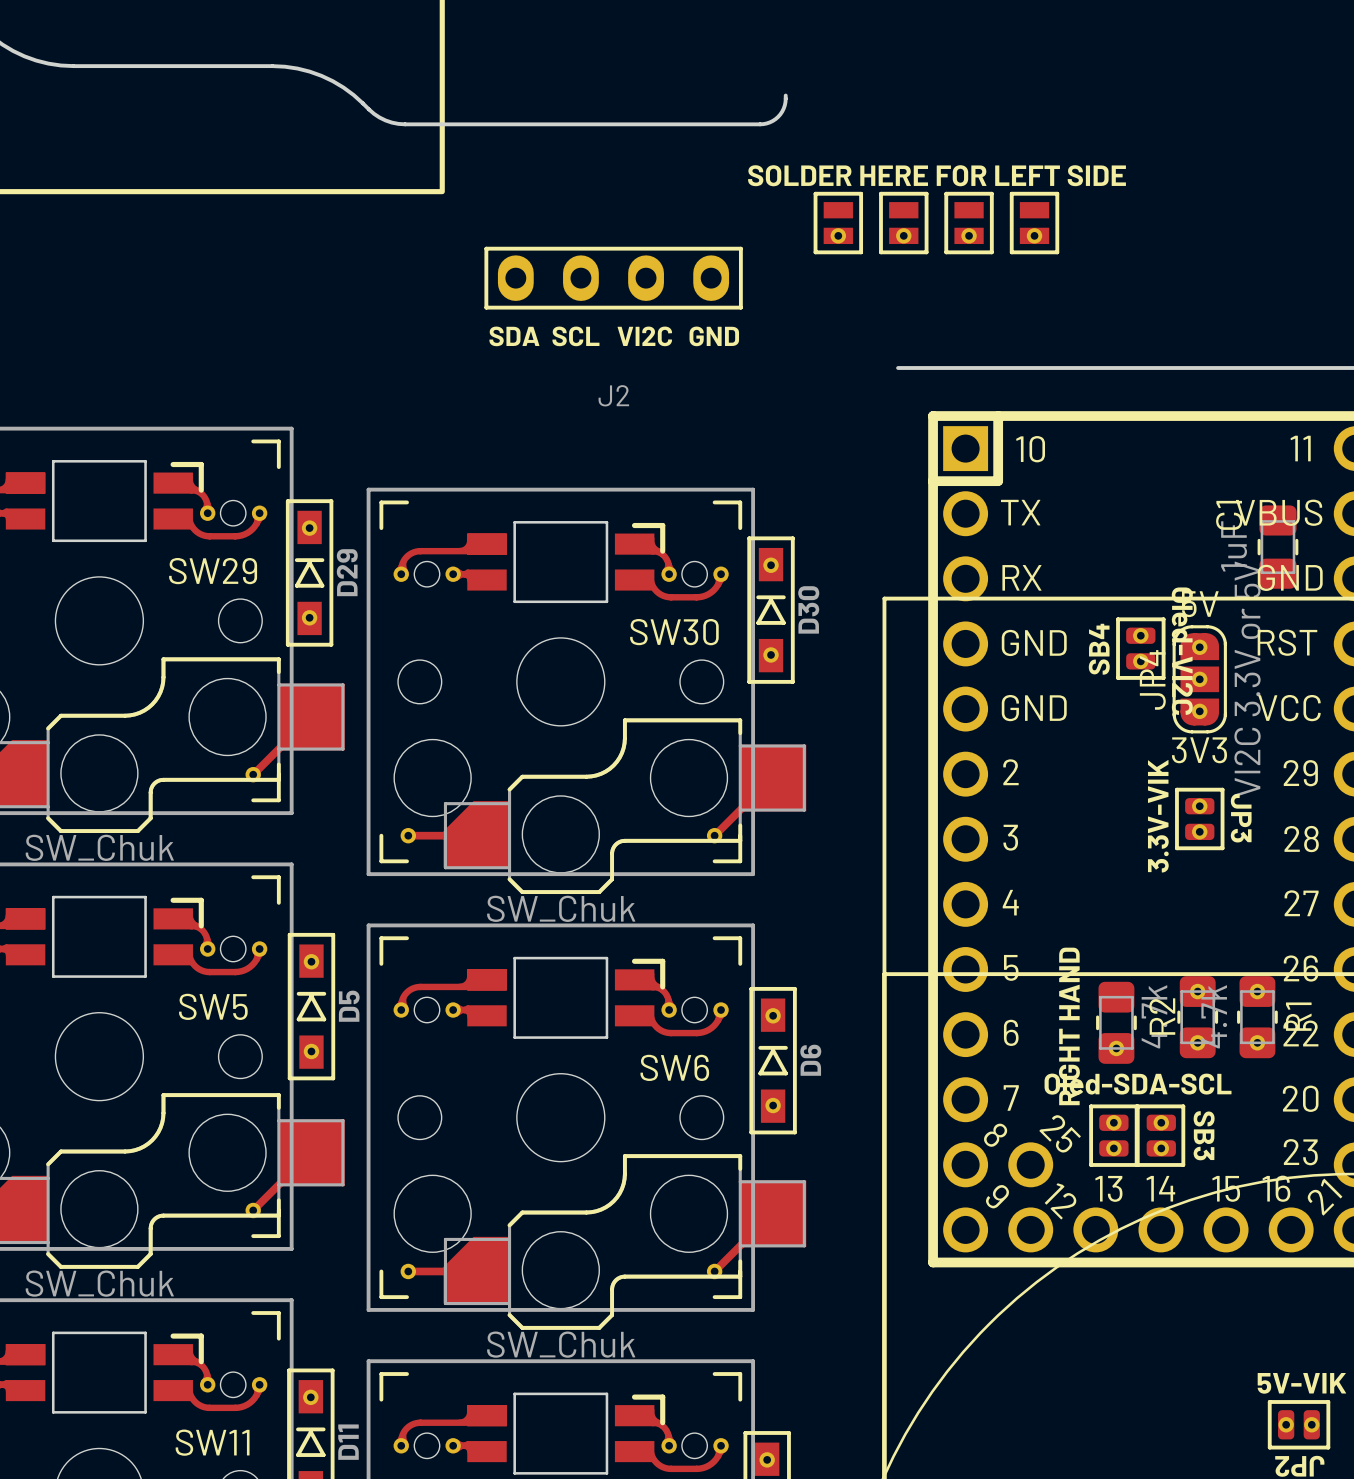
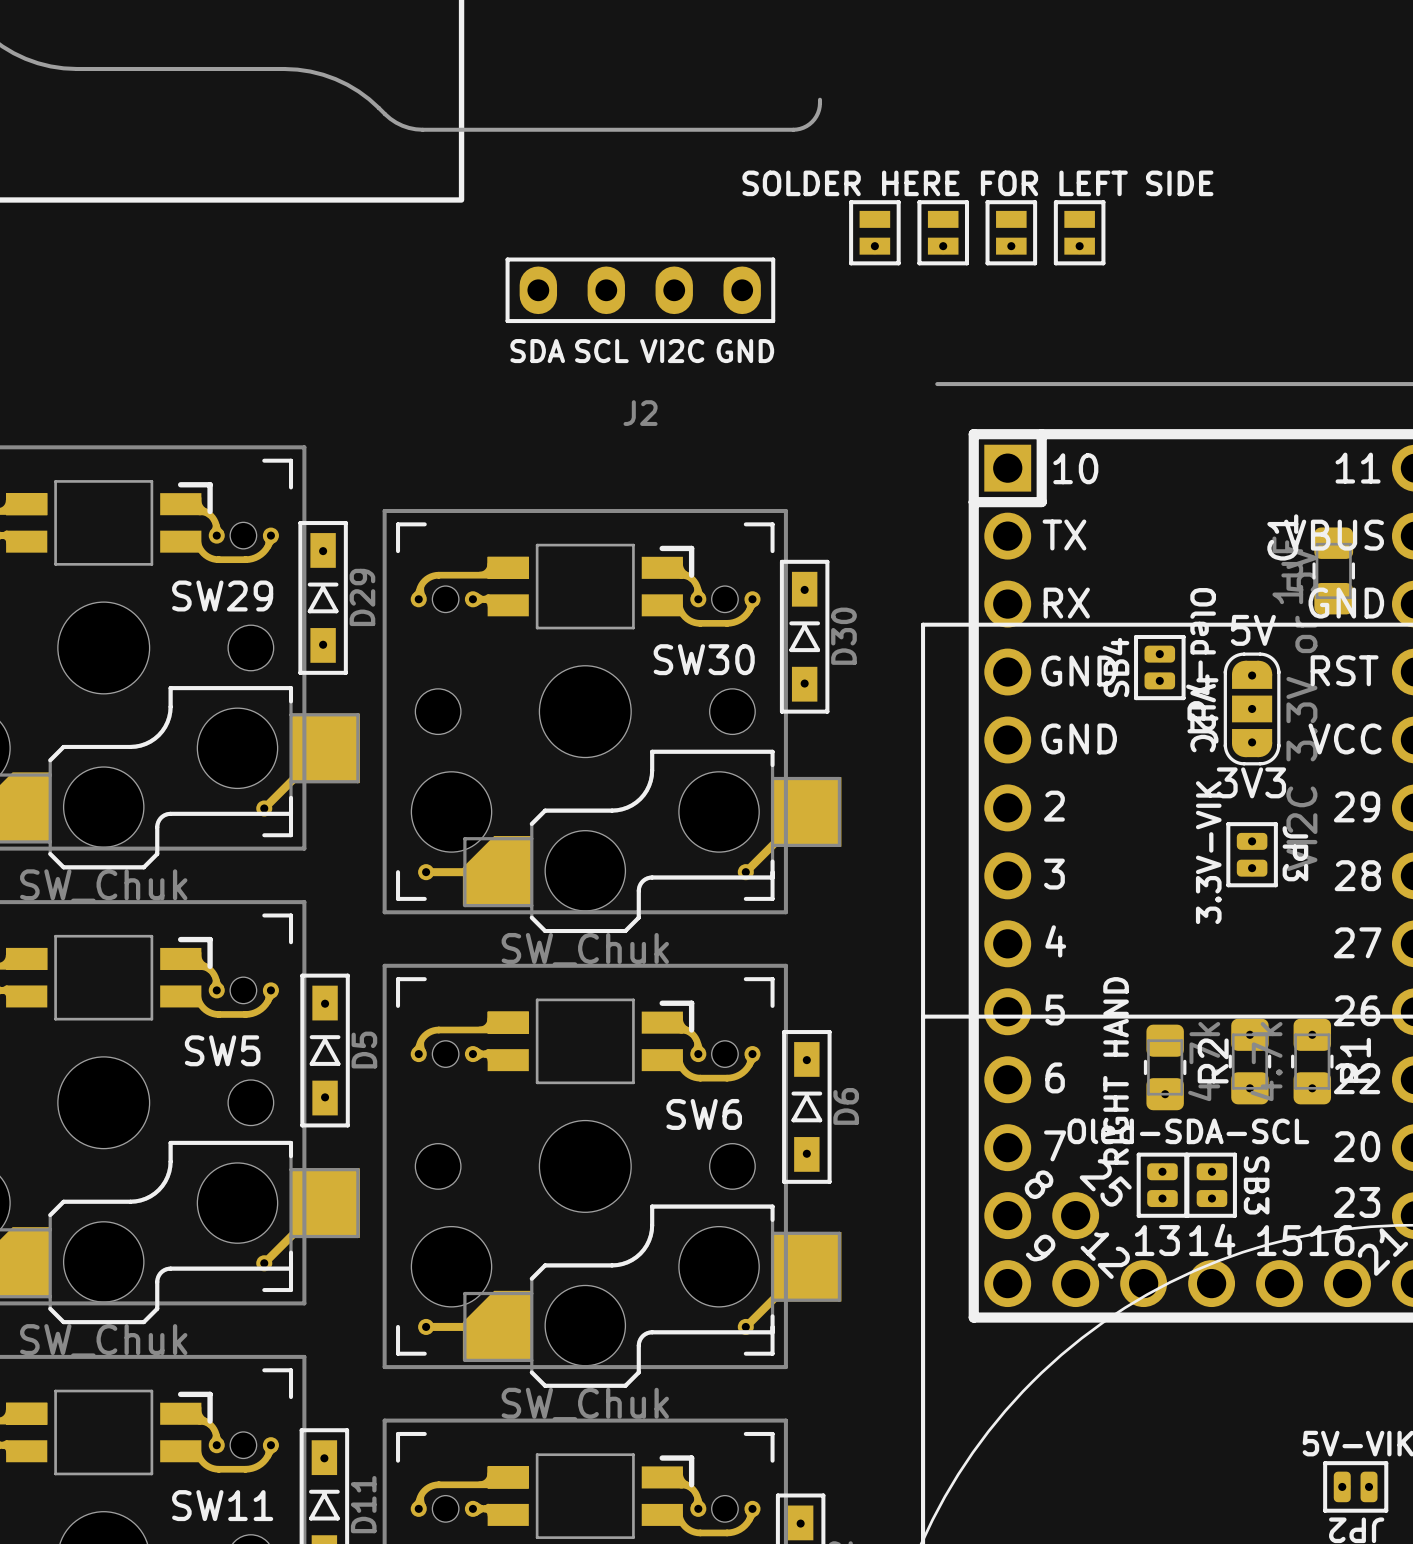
SB4 position: (1140, 648) -> (1159, 667)

